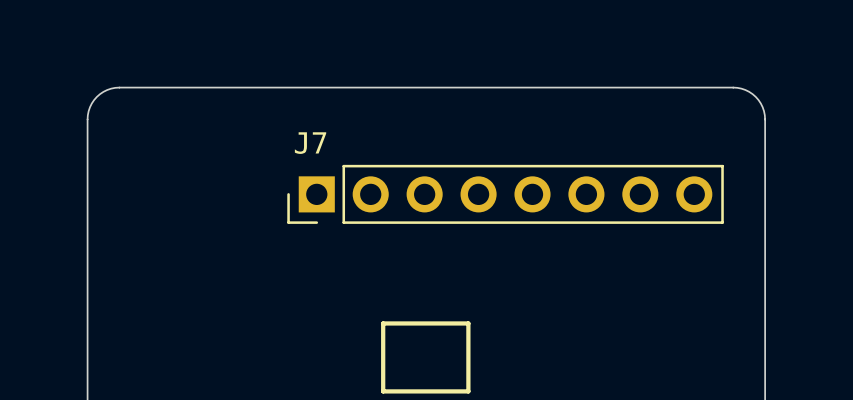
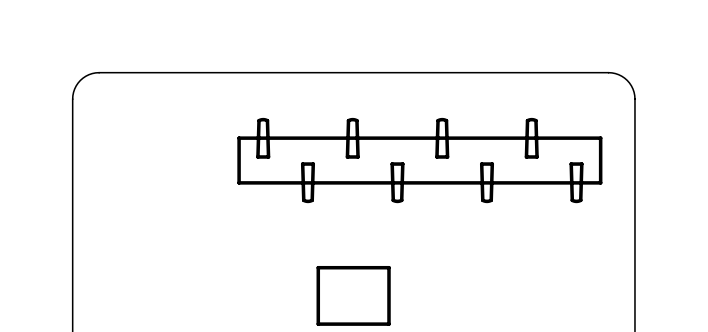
board edge: none -> (259, 120) (257, 156) (268, 156) (267, 120) (259, 120)
board edge: none -> (348, 120) (347, 156) (358, 156) (356, 120) (348, 120)
board edge: none -> (438, 120) (436, 156) (447, 156) (446, 120) (438, 120)
board edge: none -> (527, 120) (526, 156) (537, 156) (535, 120) (527, 120)
board edge: none -> (239, 138) (600, 138) (600, 182) (239, 182) (239, 138)
J7: (505, 194) -> none
board edge: none -> (302, 164) (303, 200) (310, 201) (312, 200) (313, 164) (302, 164)
board edge: none -> (392, 164) (402, 164) (401, 200) (399, 201) (393, 200) (392, 164)
board edge: none -> (481, 164) (492, 164) (491, 200) (489, 201) (482, 200) (481, 164)
board edge: none -> (571, 164) (581, 164) (580, 200) (578, 201) (572, 200) (571, 164)
board edge: none -> (318, 267) (318, 324) (388, 324) (388, 267) (318, 267)
line: (383, 323) (383, 391) (468, 391) (468, 323) (383, 323) -> none

